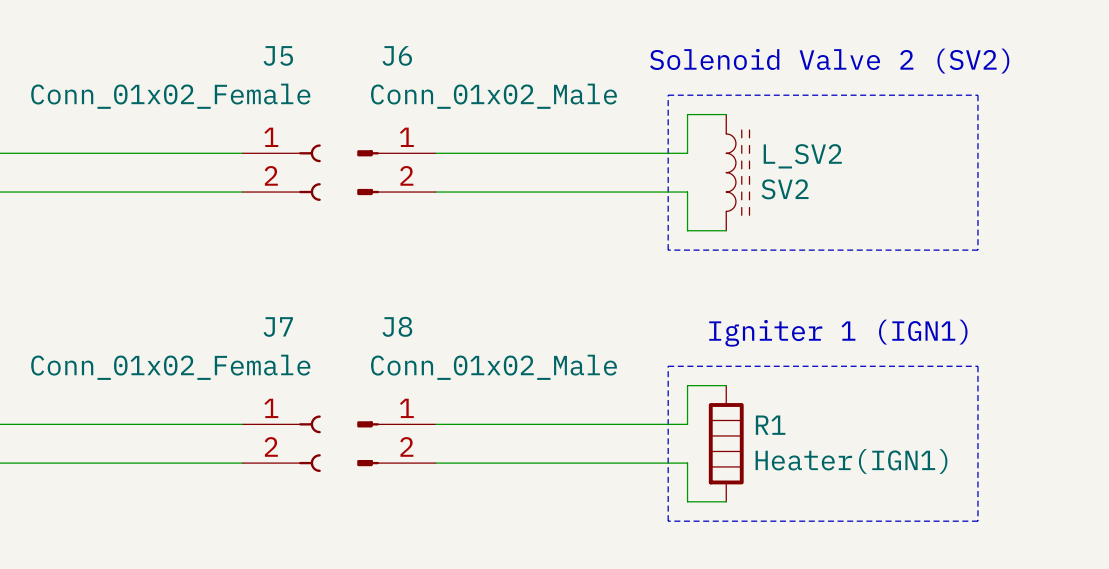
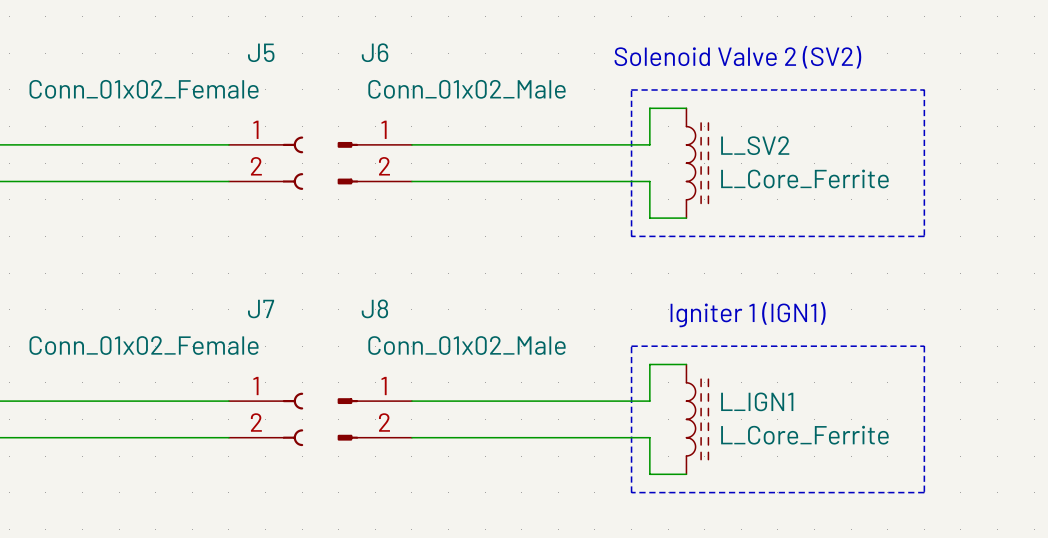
L_SV2 value: SV2 (785, 189) -> L_Core_Ferrite (804, 178)
R1: Heater(IGN1) (726, 443) -> none
L_IGN1: none -> L_Core_Ferrite (697, 419)

